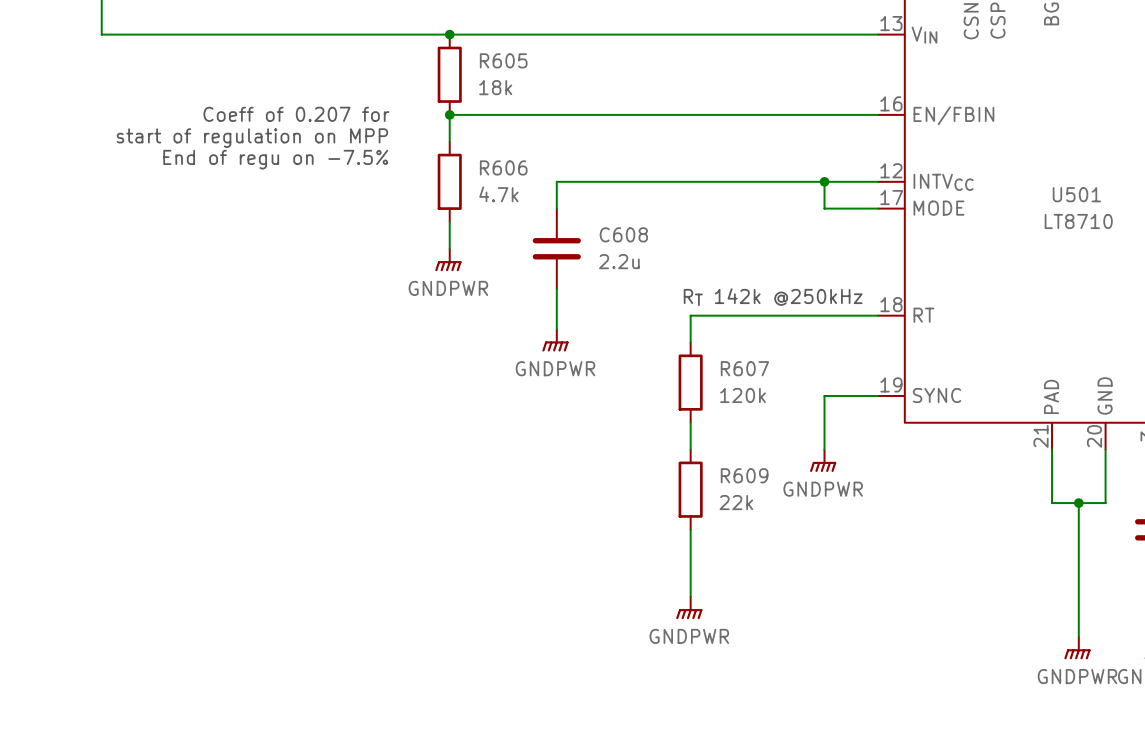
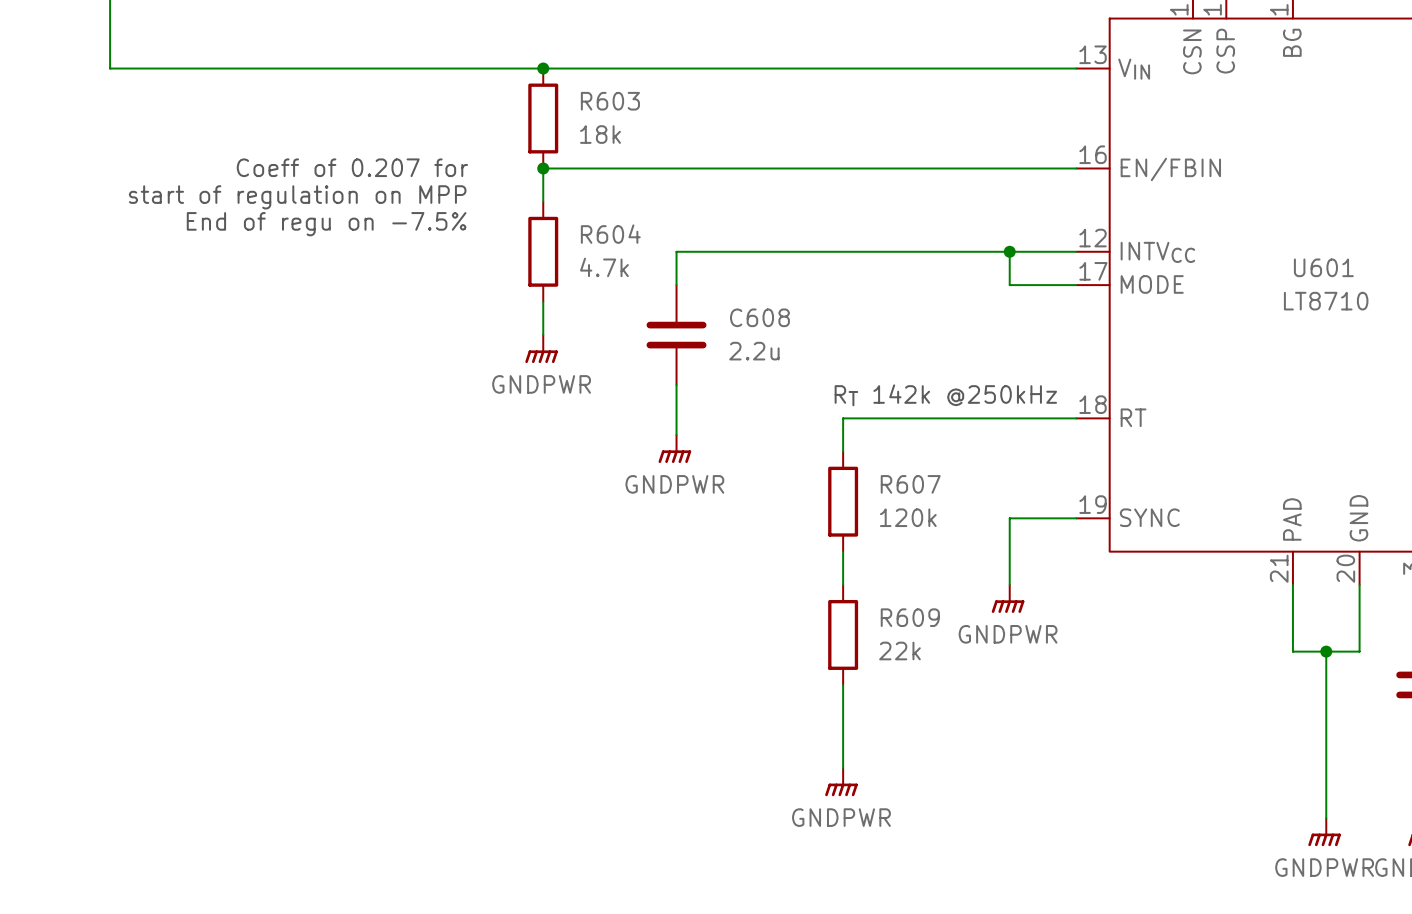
R605 name: R605 (503, 60) -> R603 (610, 101)
R606 name: R606 (503, 167) -> R604 (610, 234)
U501 name: U501 (1076, 194) -> U601 (1323, 267)

